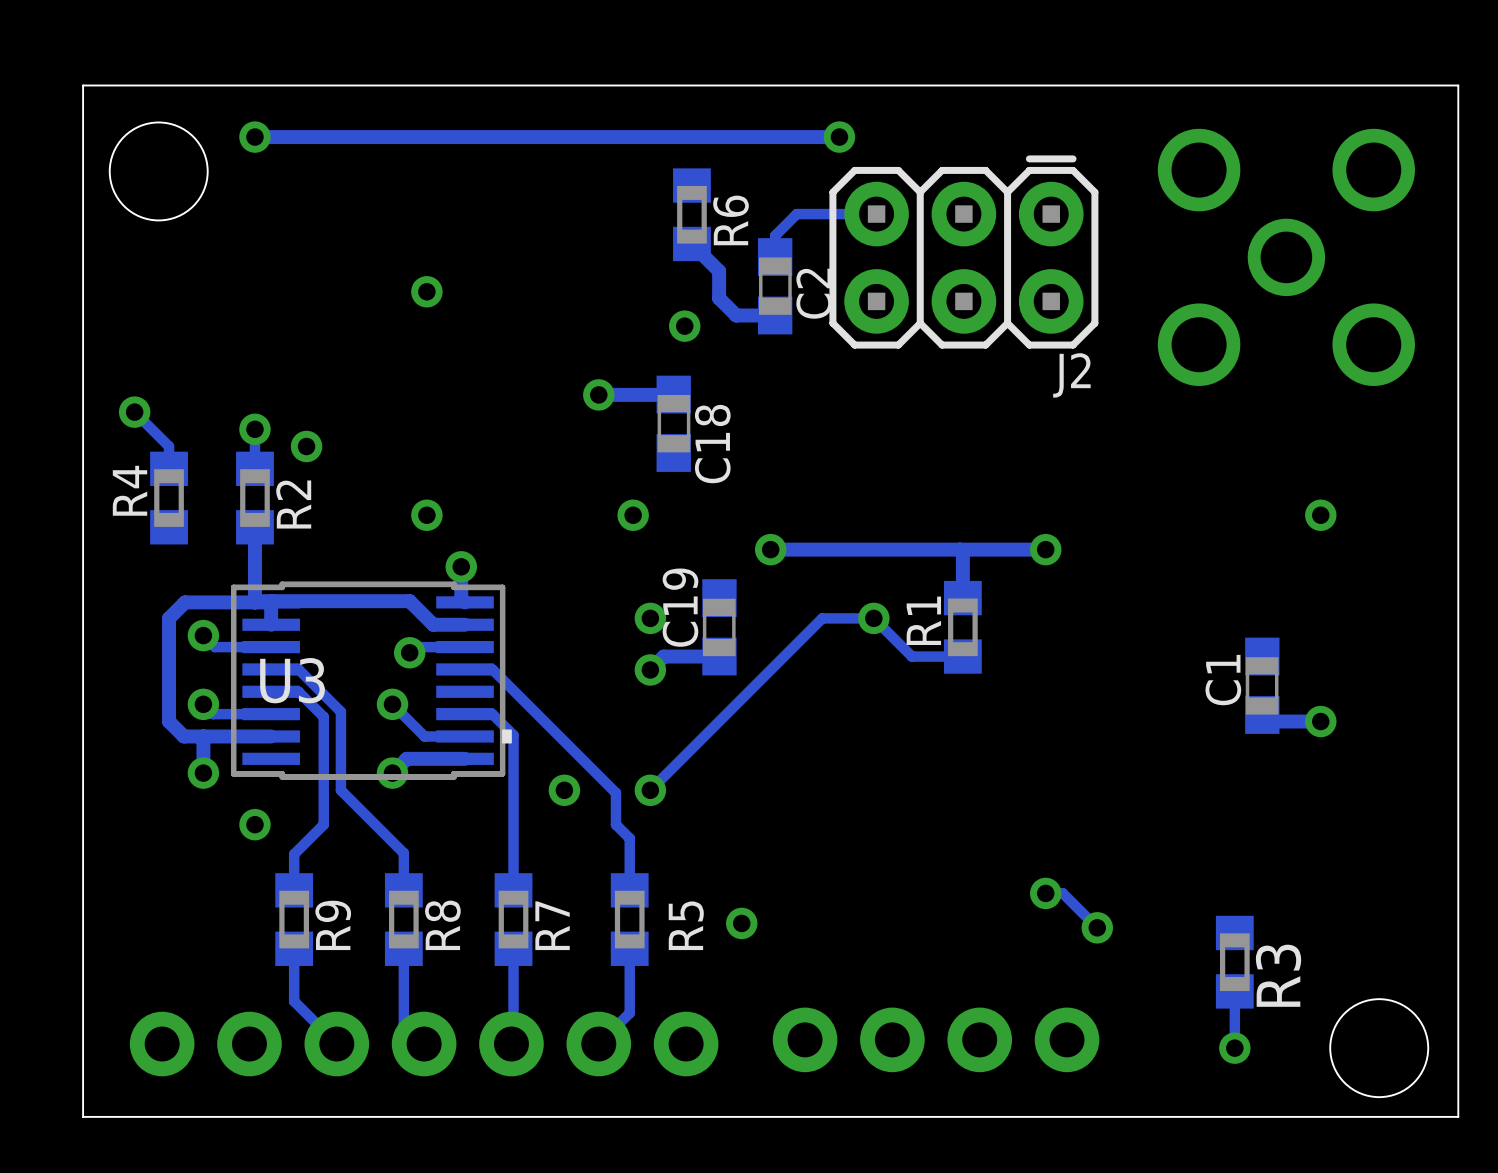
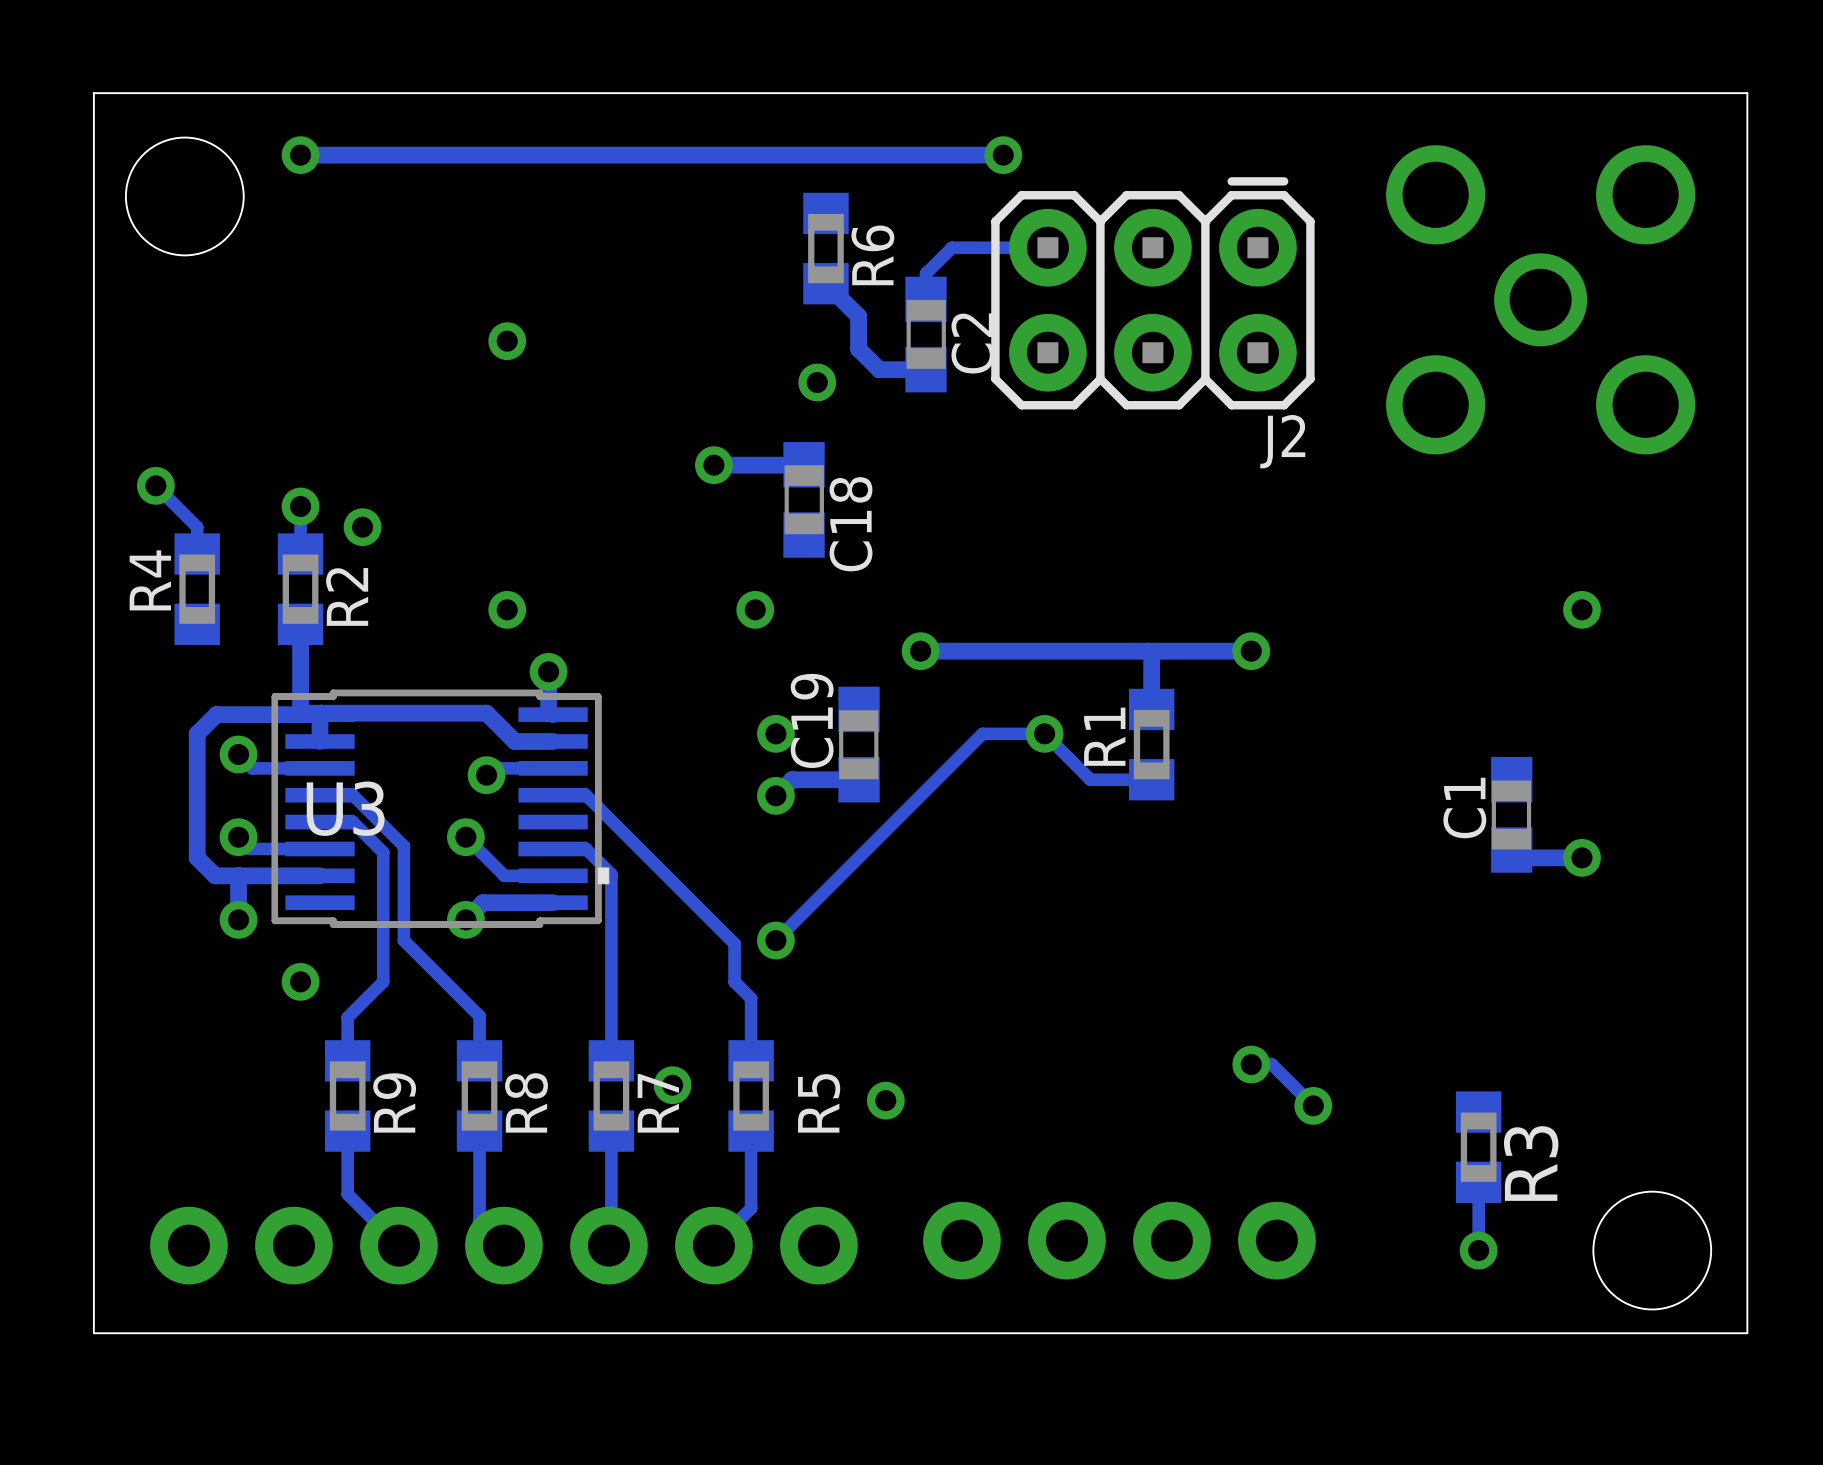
via position: (564, 790) -> (672, 1085)

